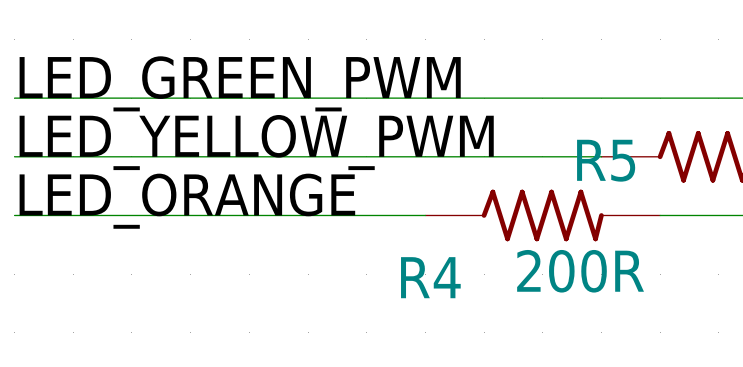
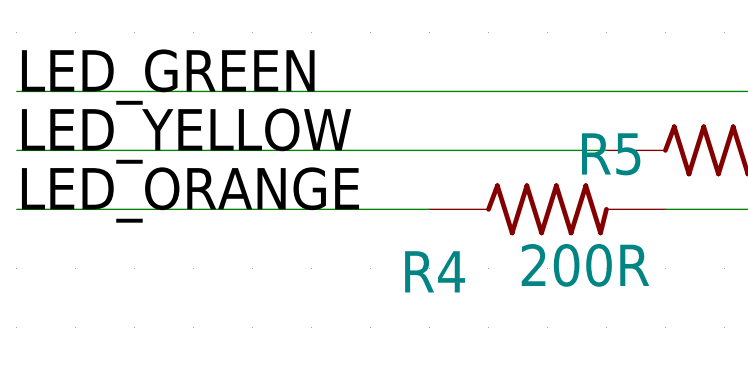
label: LED_GREEN_PWM (240, 83) -> LED_GREEN (168, 77)
label: LED_YELLOW_PWM (256, 142) -> LED_YELLOW (186, 136)

